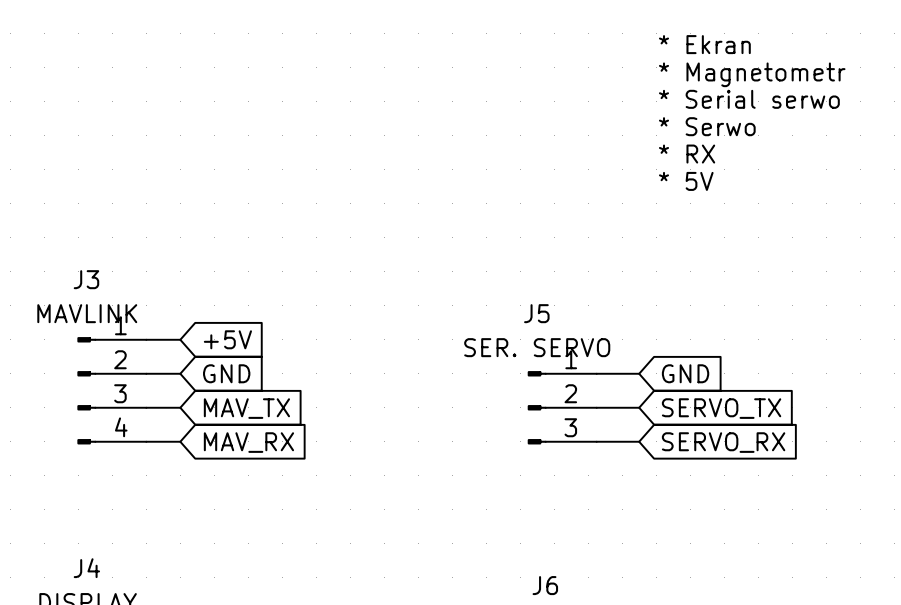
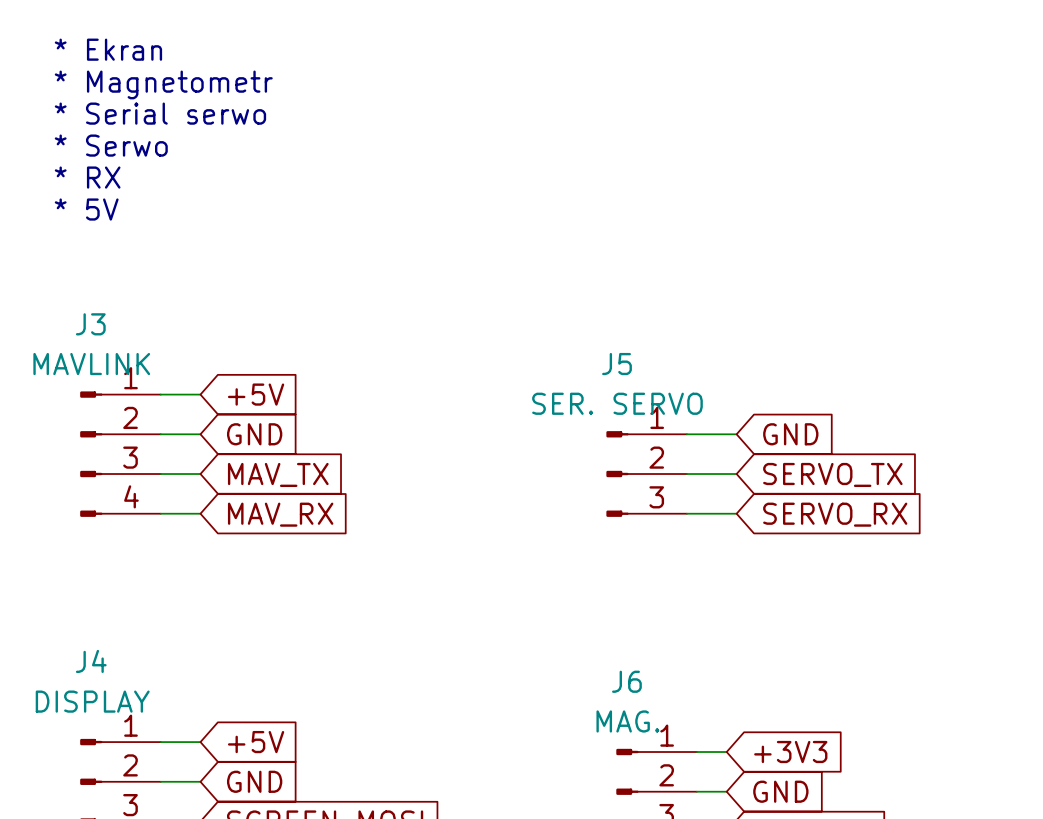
text: none -> * Ekran (108, 49)
text: * Ekran (704, 44) -> none
text: none -> * Magnetometr (163, 84)
text: * Magnetometr (752, 74) -> none
text: none -> * Serial serwo (160, 113)
text: * Serial serwo (749, 99) -> none
text: none -> * Serwo (111, 145)
text: * Serwo (707, 126) -> none
text: none -> * RX (87, 177)
text: * RX (687, 154) -> none
text: none -> * 5V (86, 209)
text: * 5V (686, 181) -> none

